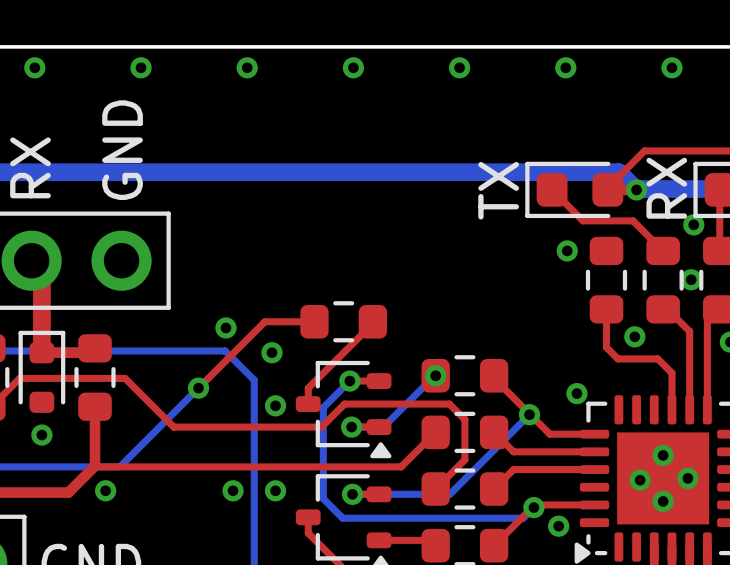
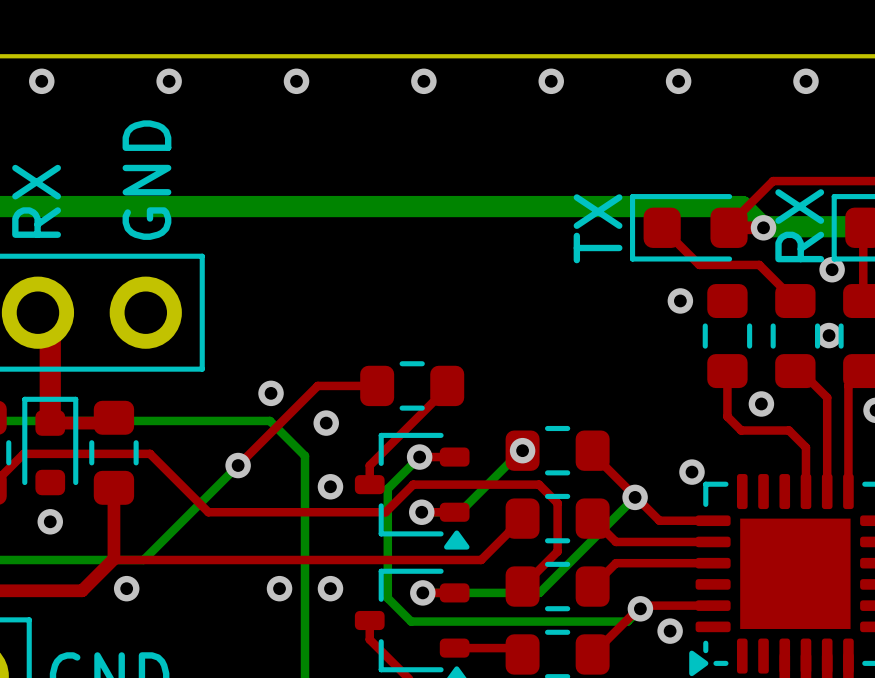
via: (663, 455) -> none
via: (687, 478) -> none
via: (640, 480) -> none
via: (663, 501) -> none

